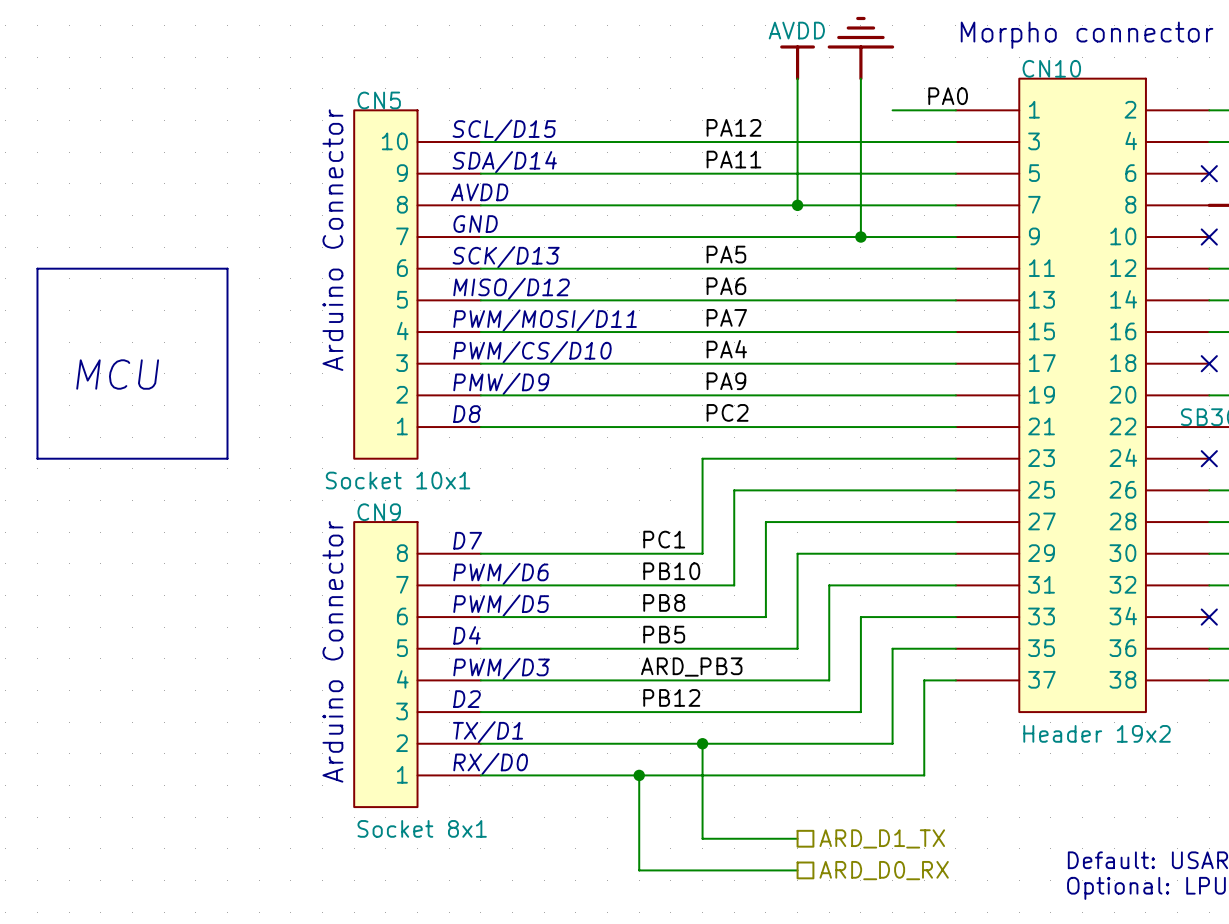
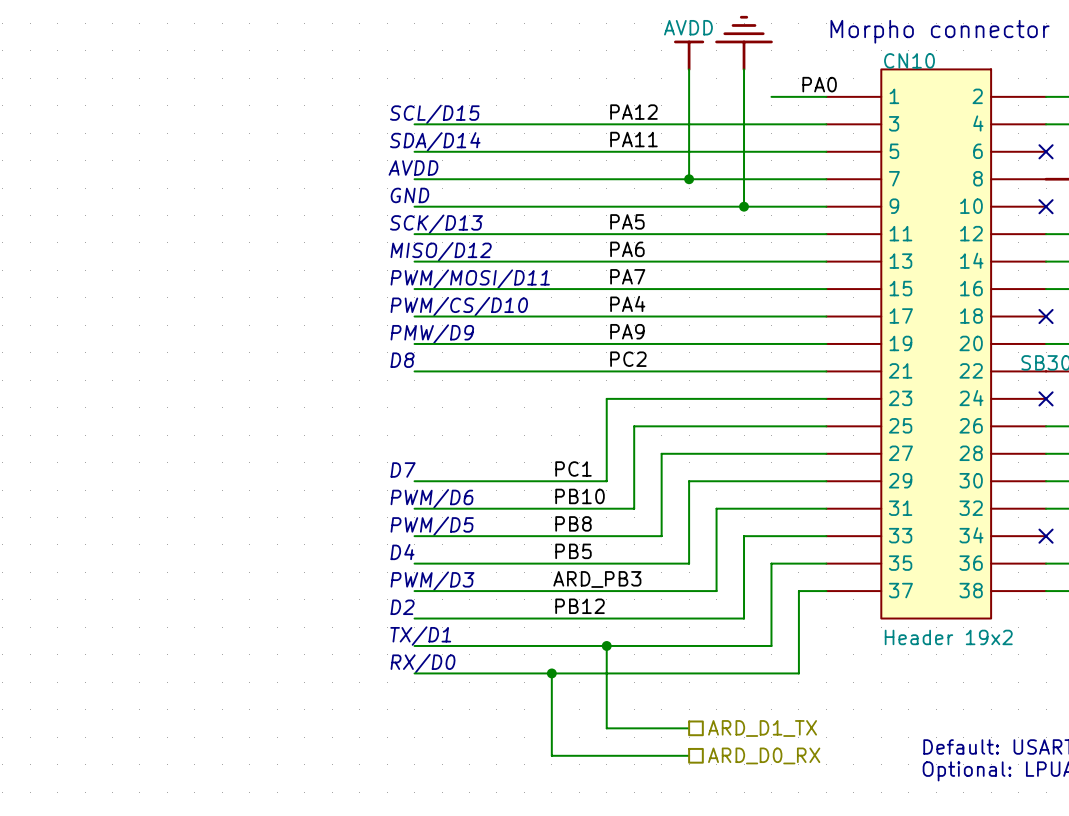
text: Arduino Connector (332, 240) -> none
line: (37, 268) (37, 458) (227, 458) (227, 268) (37, 268) -> none
CN5: (417, 284) -> none
text: MCU (117, 374) -> none
text: Arduino Connector (332, 651) -> none
CN9: (417, 664) -> none

